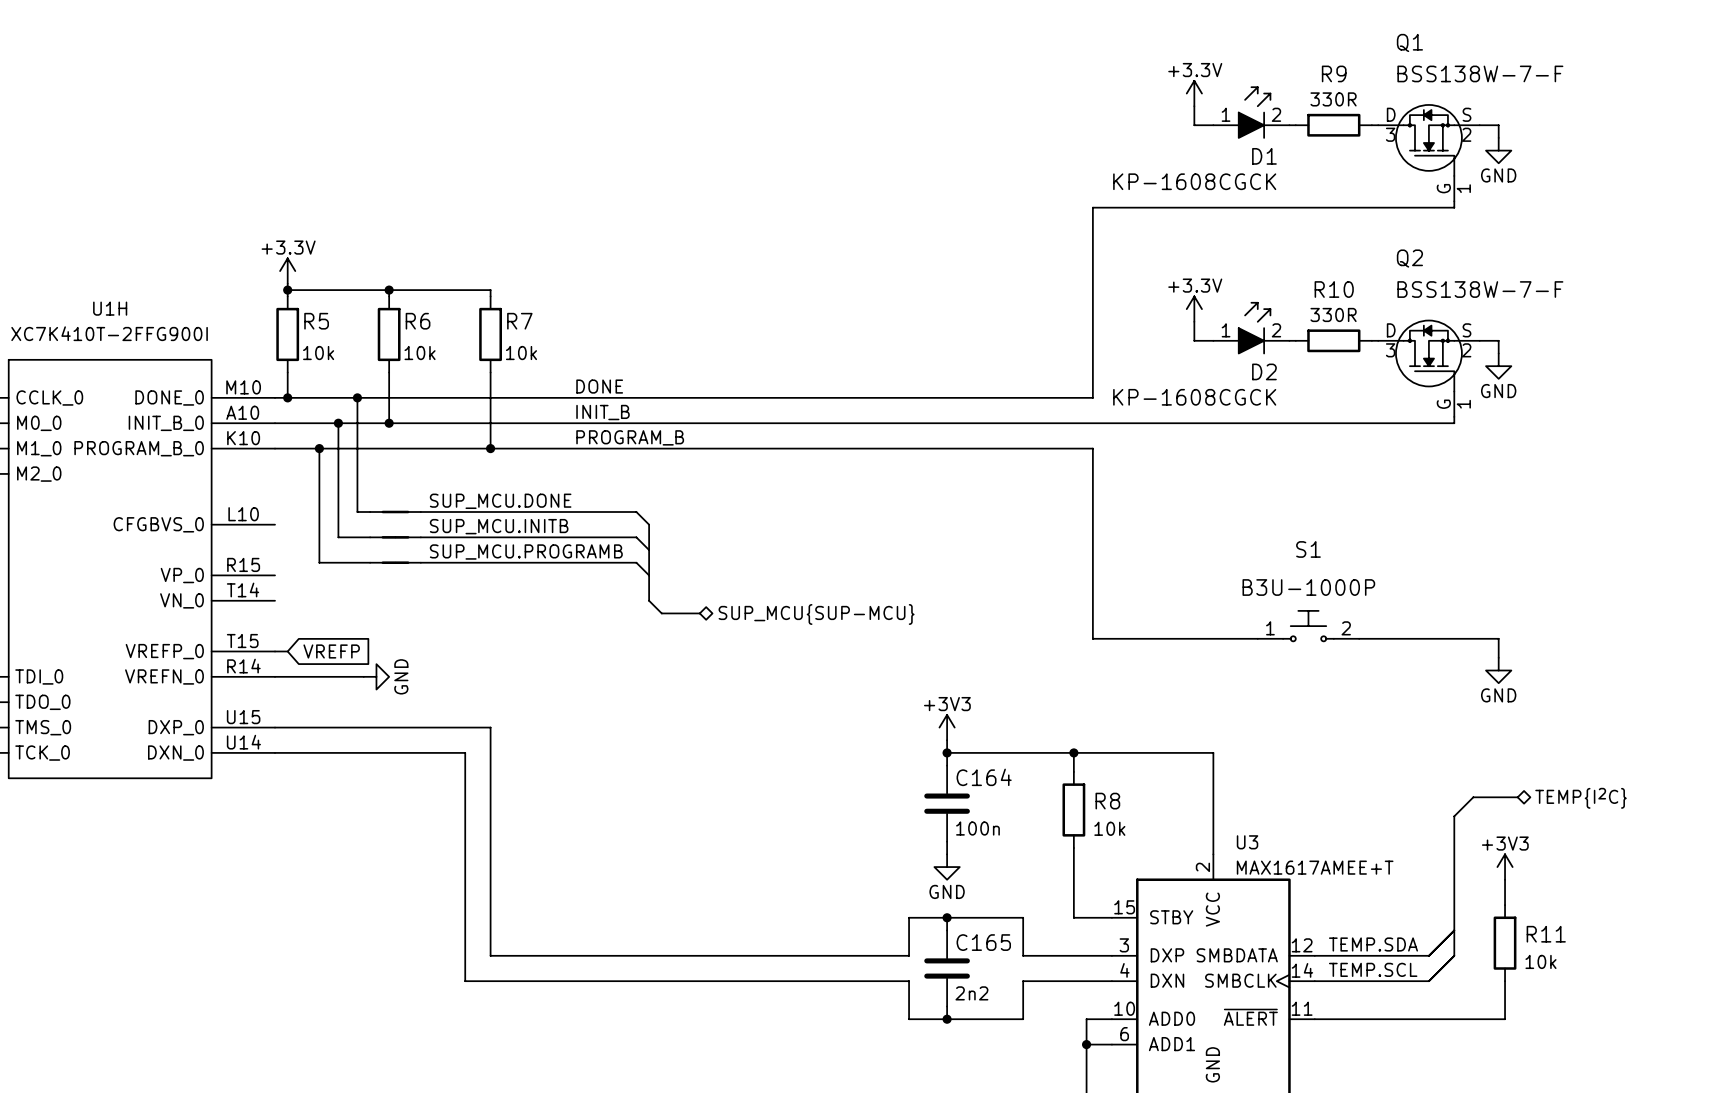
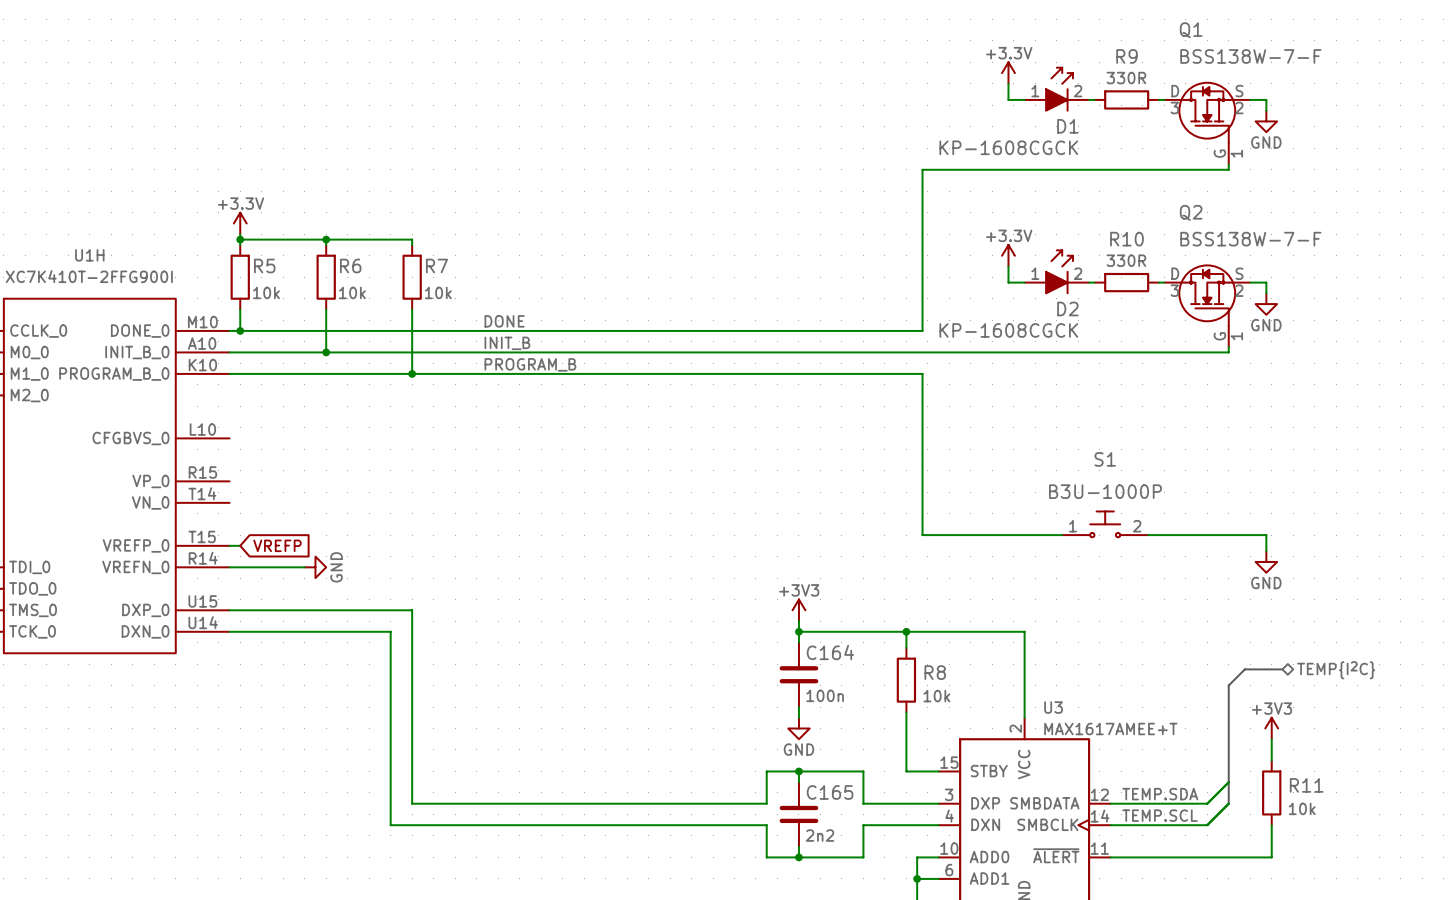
wire: (357, 397) (357, 512) (370, 512) -> none
junction: (357, 397) -> none
wire: (338, 423) (338, 537) (370, 537) -> none
junction: (338, 423) -> none
wire: (319, 448) (319, 562) (370, 562) -> none
junction: (319, 448) -> none
label: SUP_MCU.DONE (500, 501) -> none
part: (395, 512) -> none
wire: (420, 512) (636, 512) (649, 524) -> none
bus: (649, 524) (649, 600) (661, 613) (699, 613) -> none
label: SUP_MCU.INITB (499, 526) -> none
part: (395, 537) -> none
wire: (420, 537) (636, 537) (649, 550) -> none
label: SUP_MCU.PROGRAMB (526, 552) -> none
part: (395, 562) -> none
wire: (420, 562) (636, 562) (649, 575) -> none
hierarchical label: SUP_MCU{SUP-MCU} (816, 614) -> none

